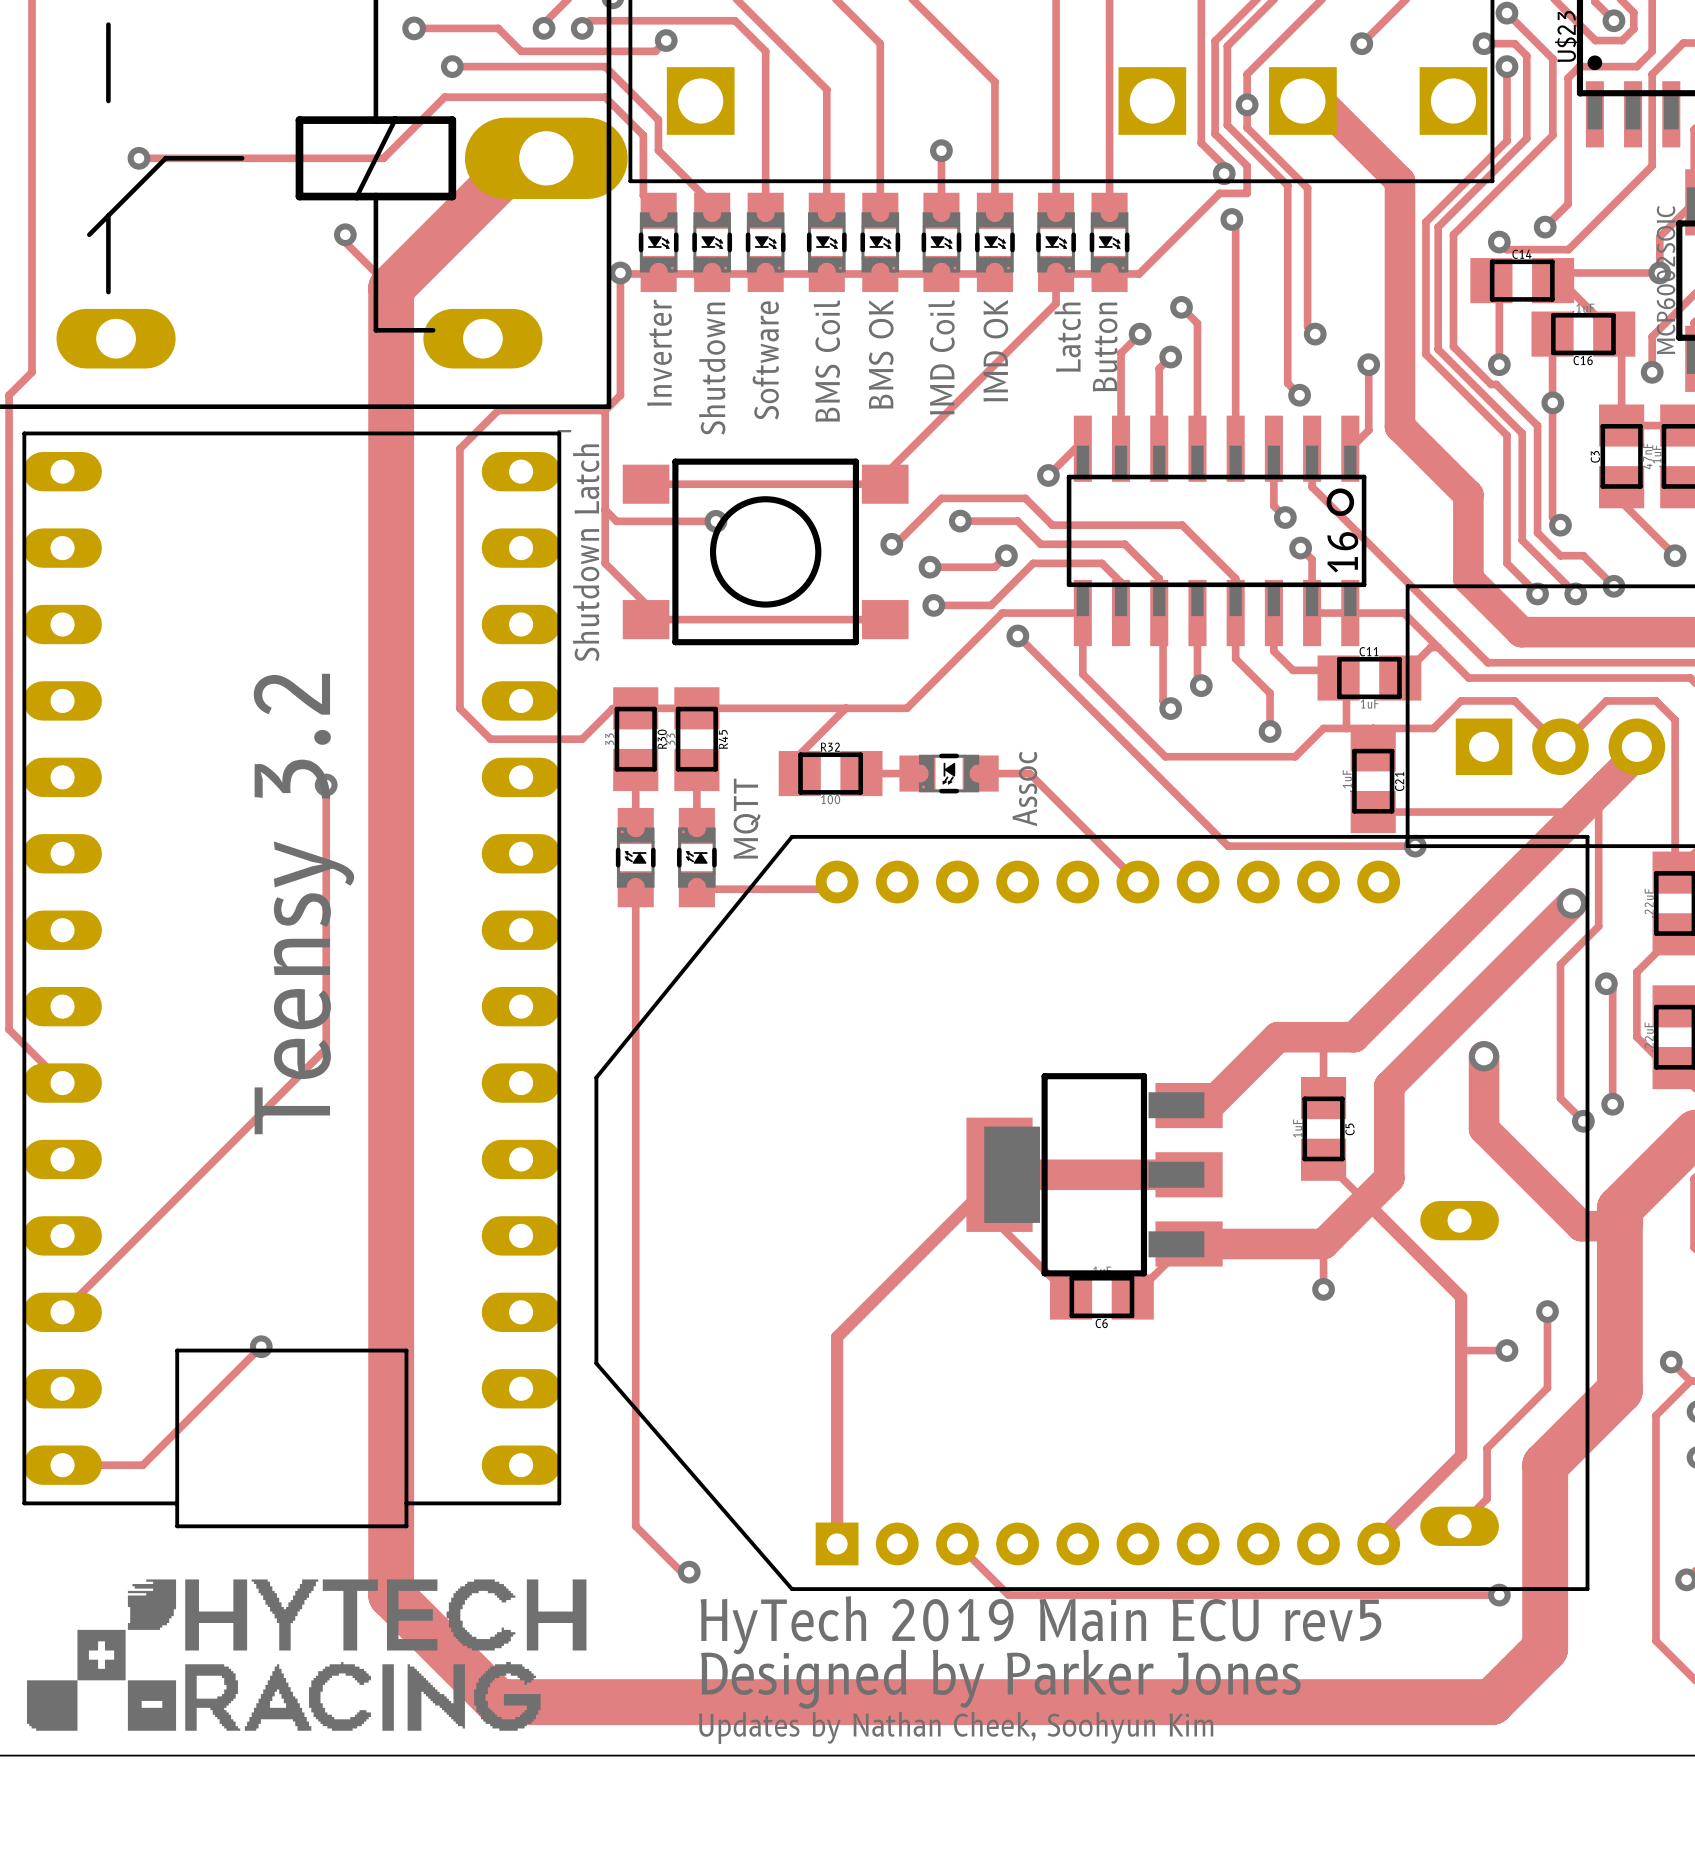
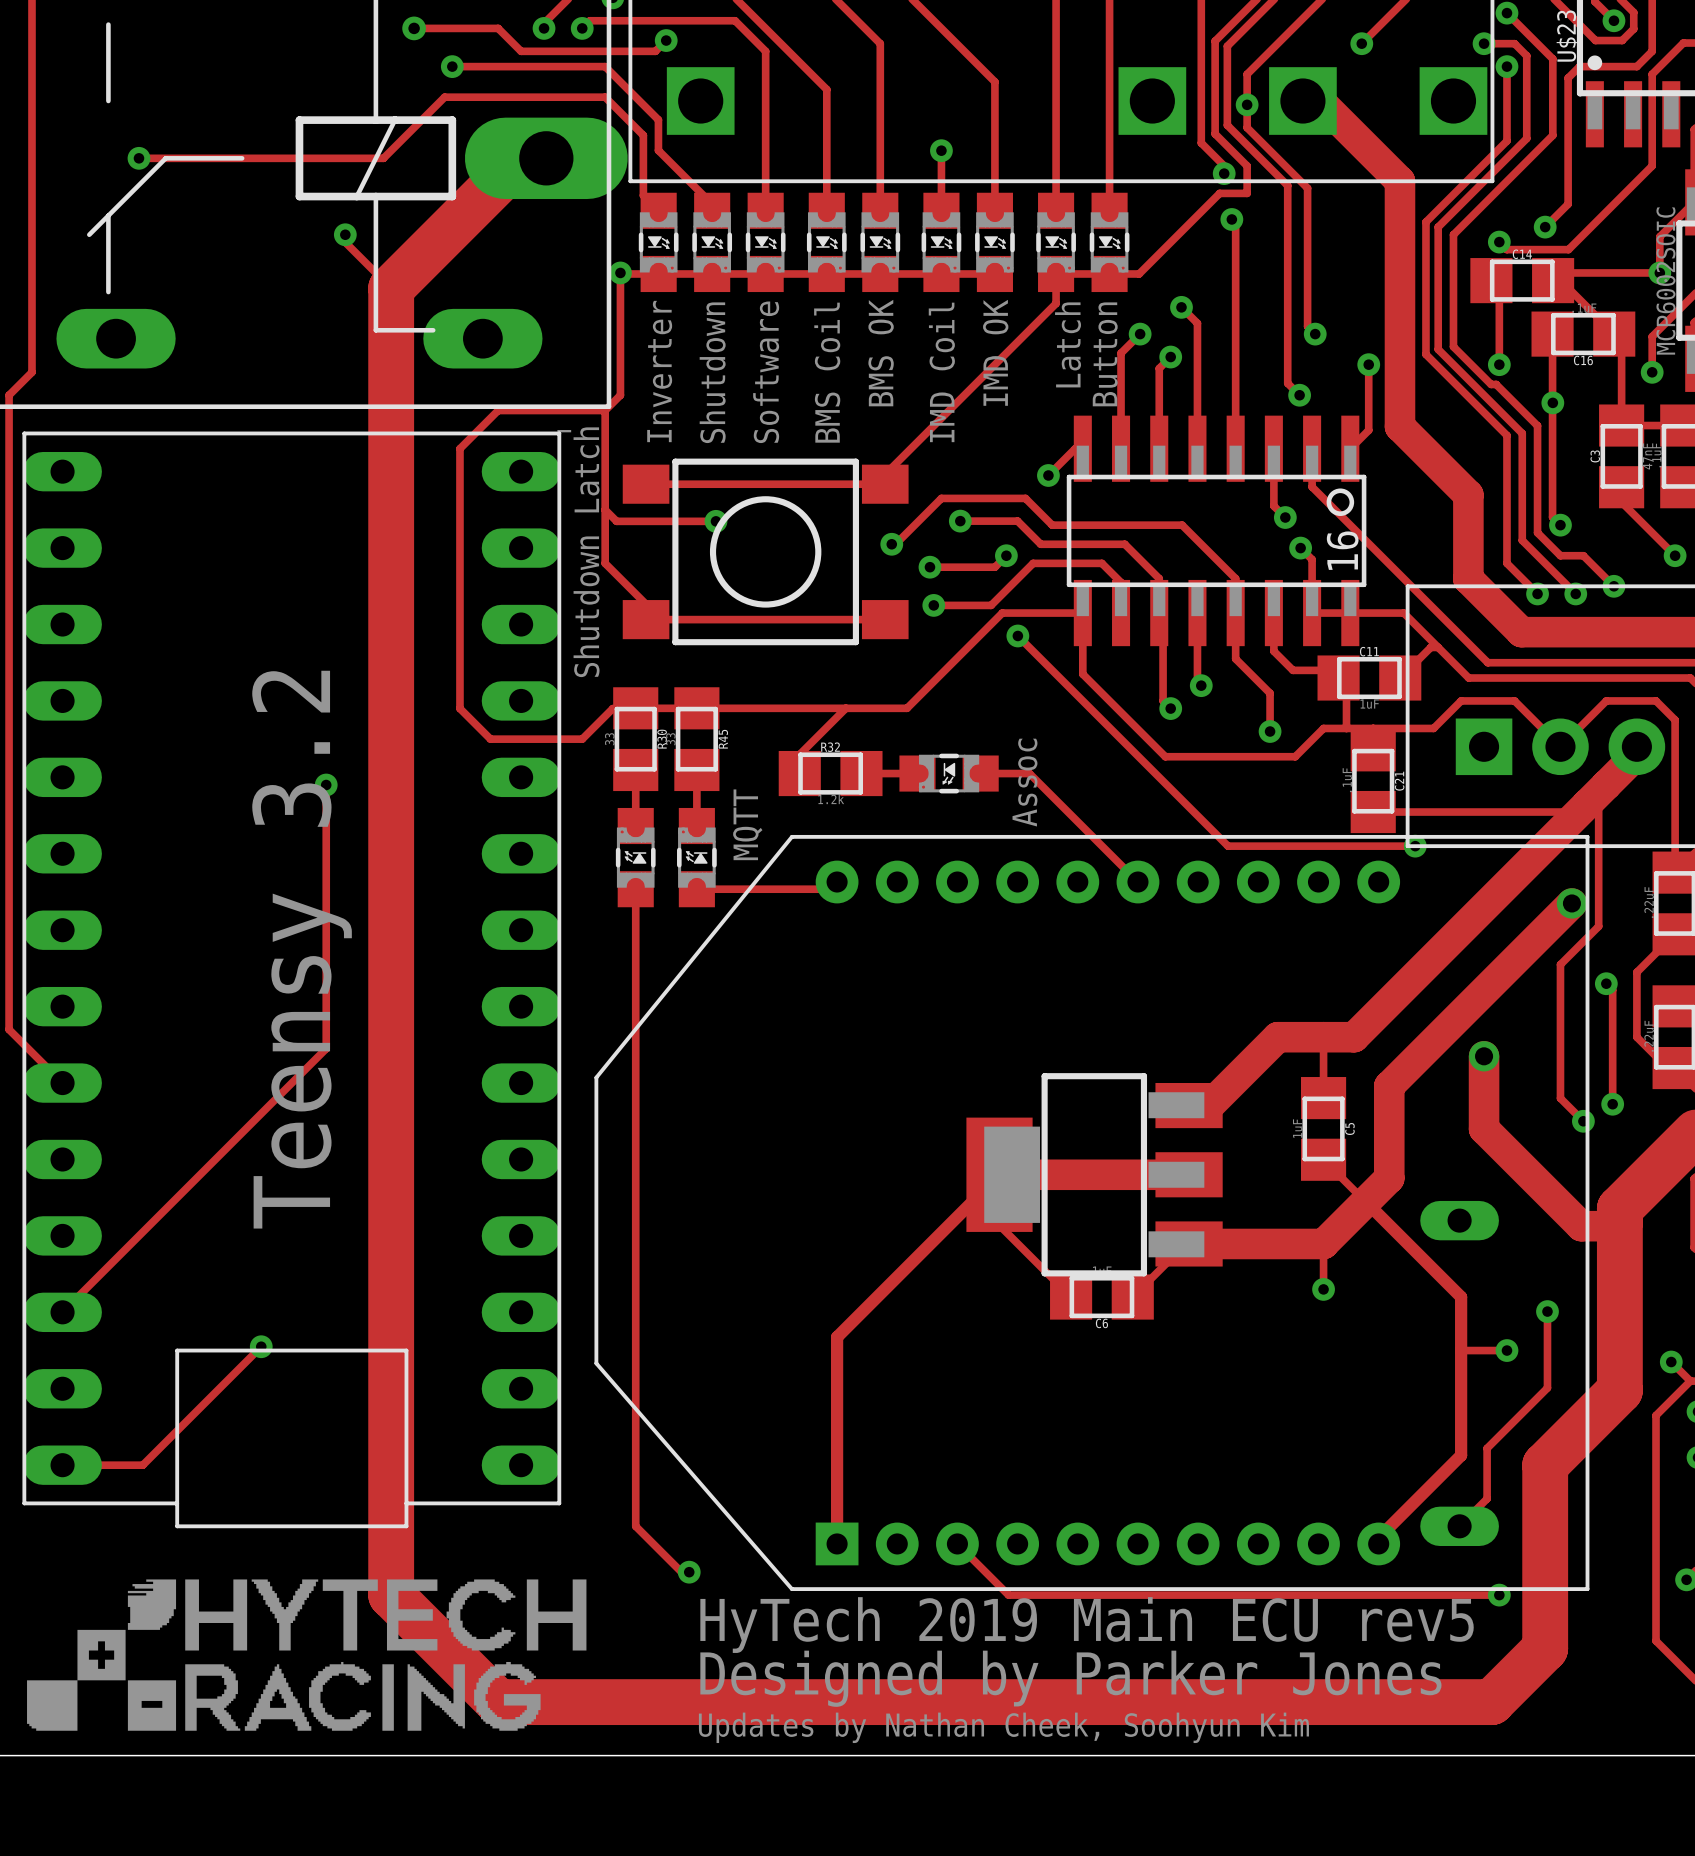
R32 value: 100 (830, 799) -> 1.2k (831, 799)

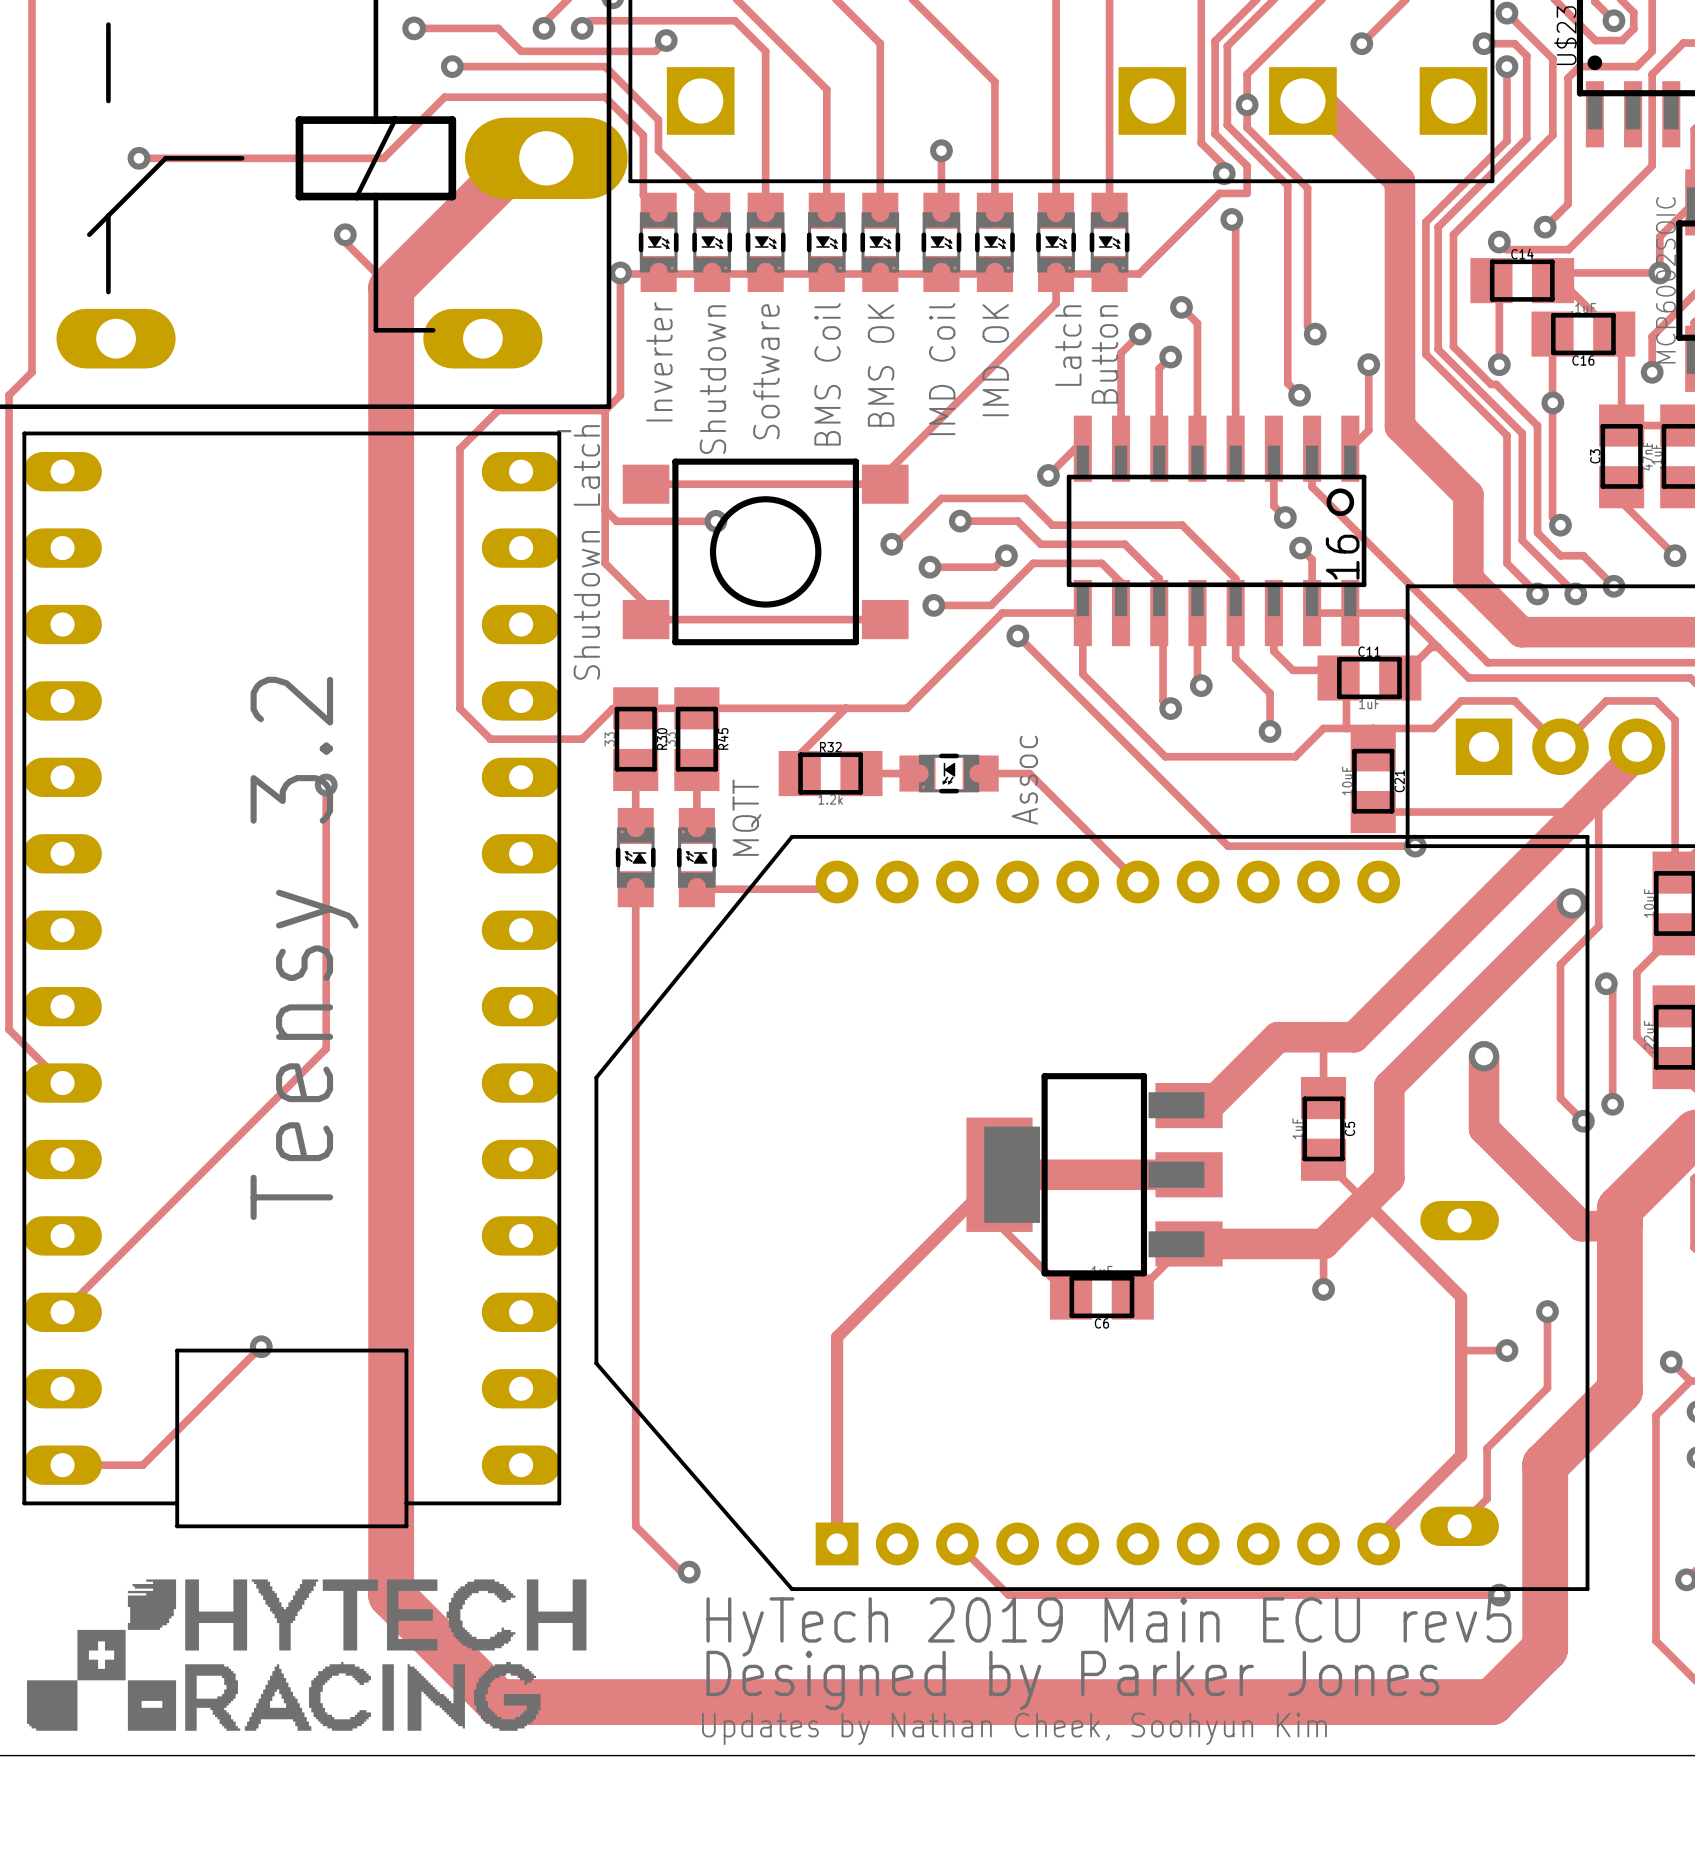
C21 value: .1uF (1347, 780) -> 10uF (1347, 780)
part value: .22uF (1649, 902) -> 10uF (1649, 903)

